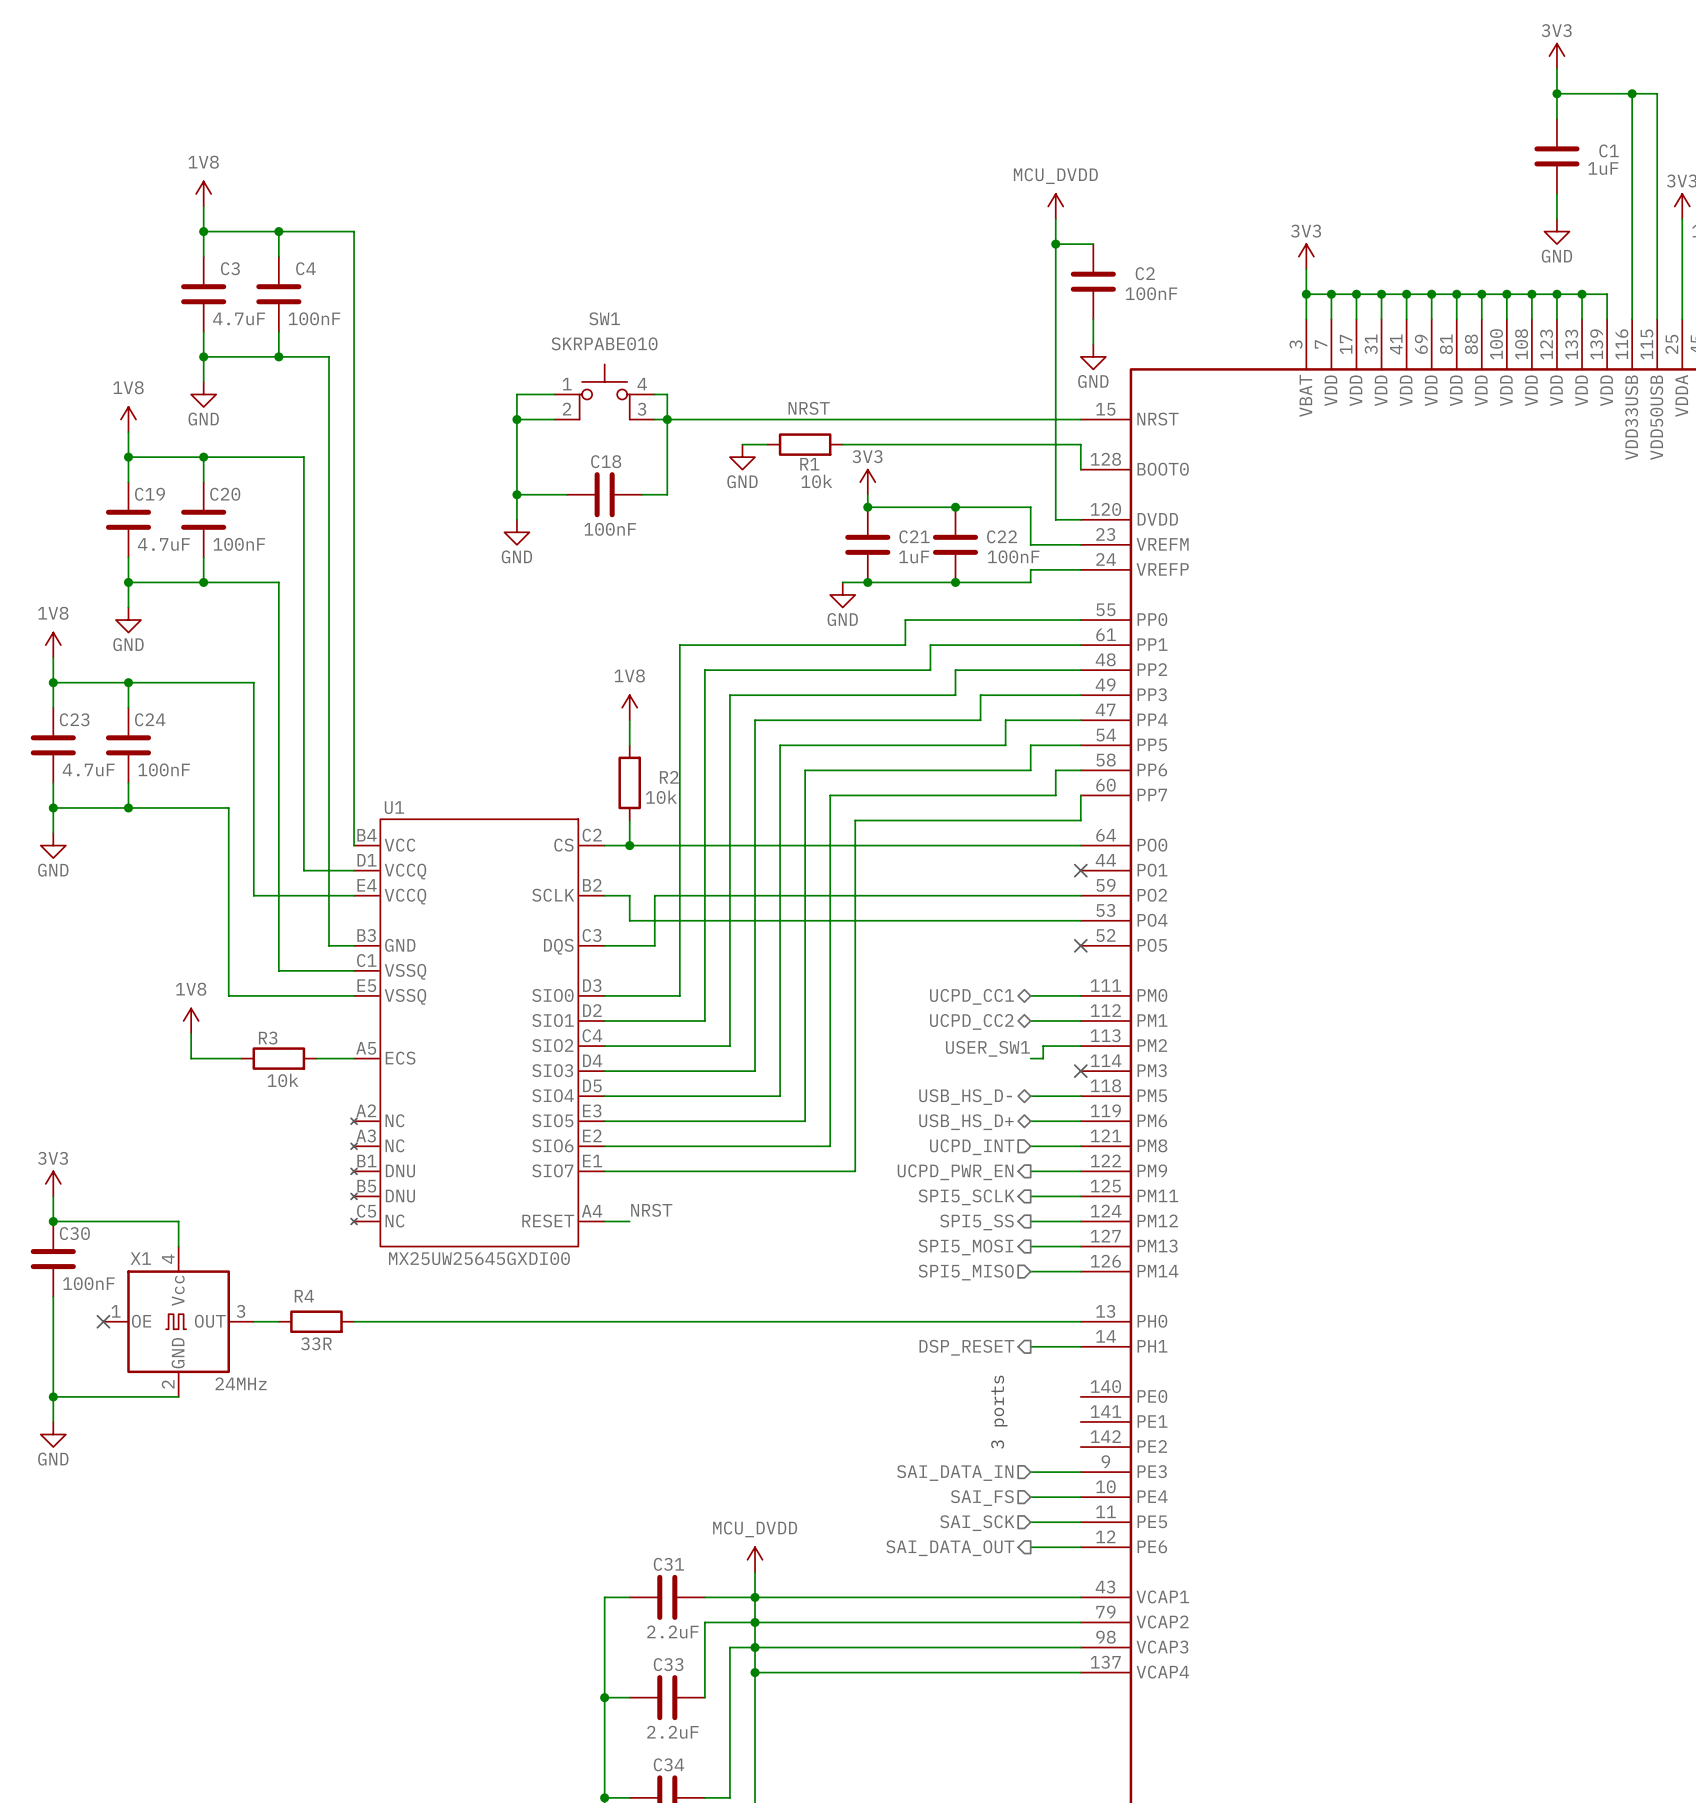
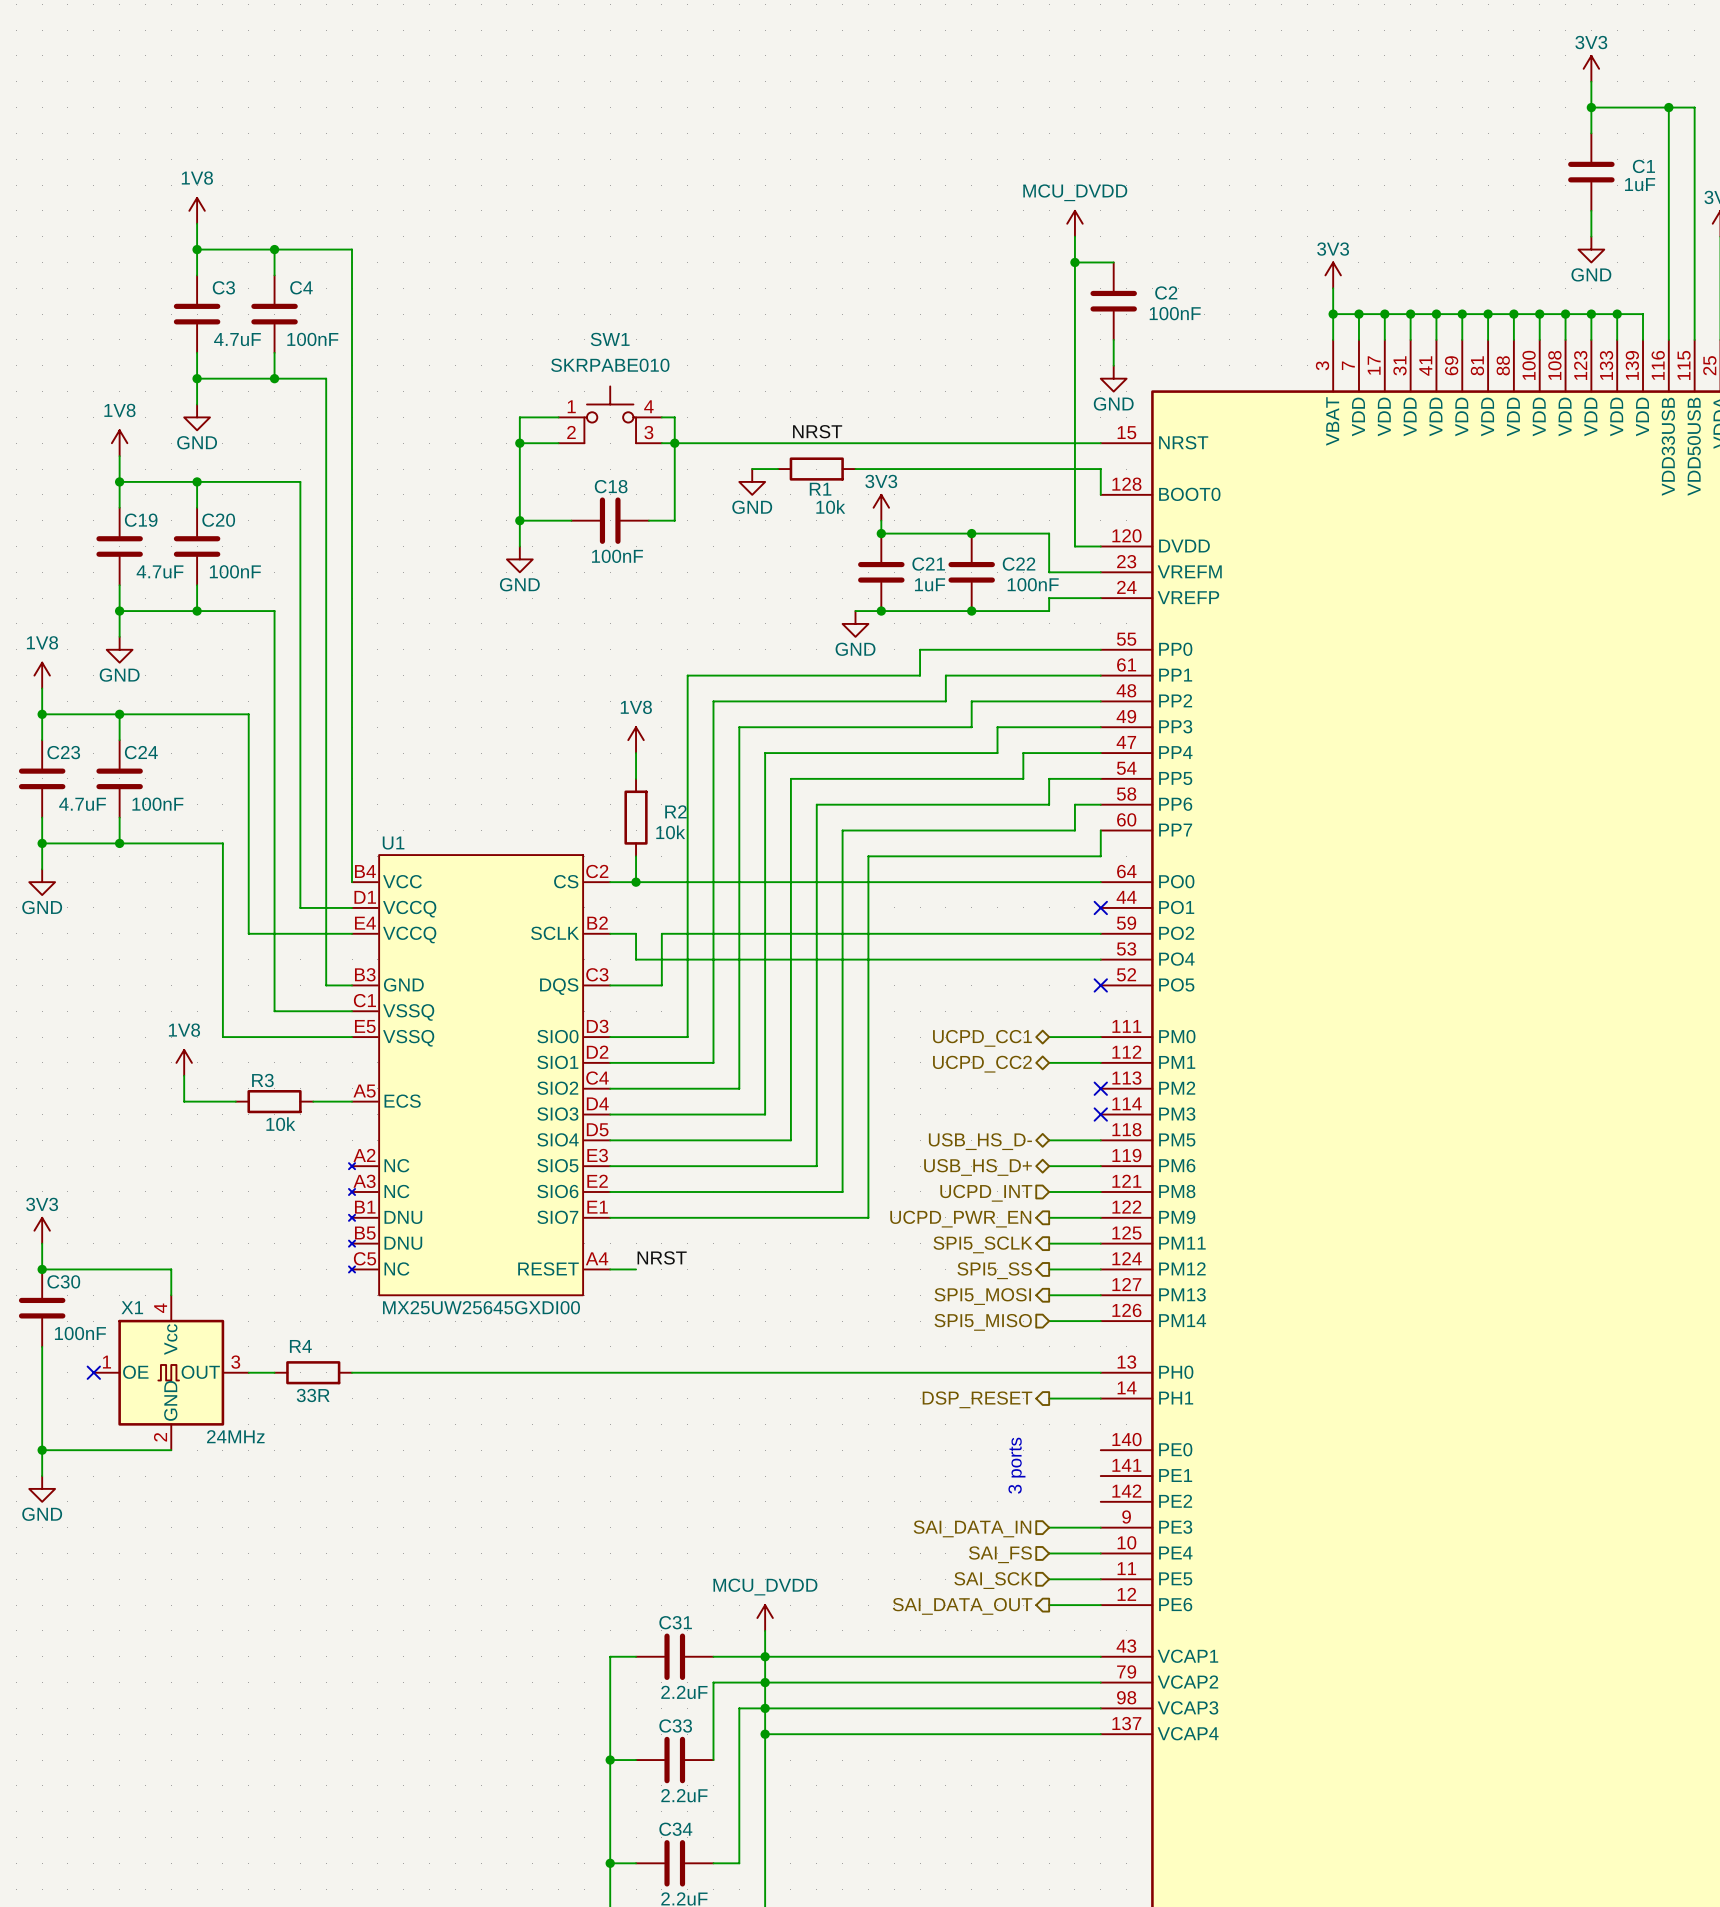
wire: (1080, 1046) (1043, 1046) (1043, 1058) (1030, 1058) -> none
no-connect mark: none -> (1100, 1088)
label: USER_SW1 (987, 1048) -> none

